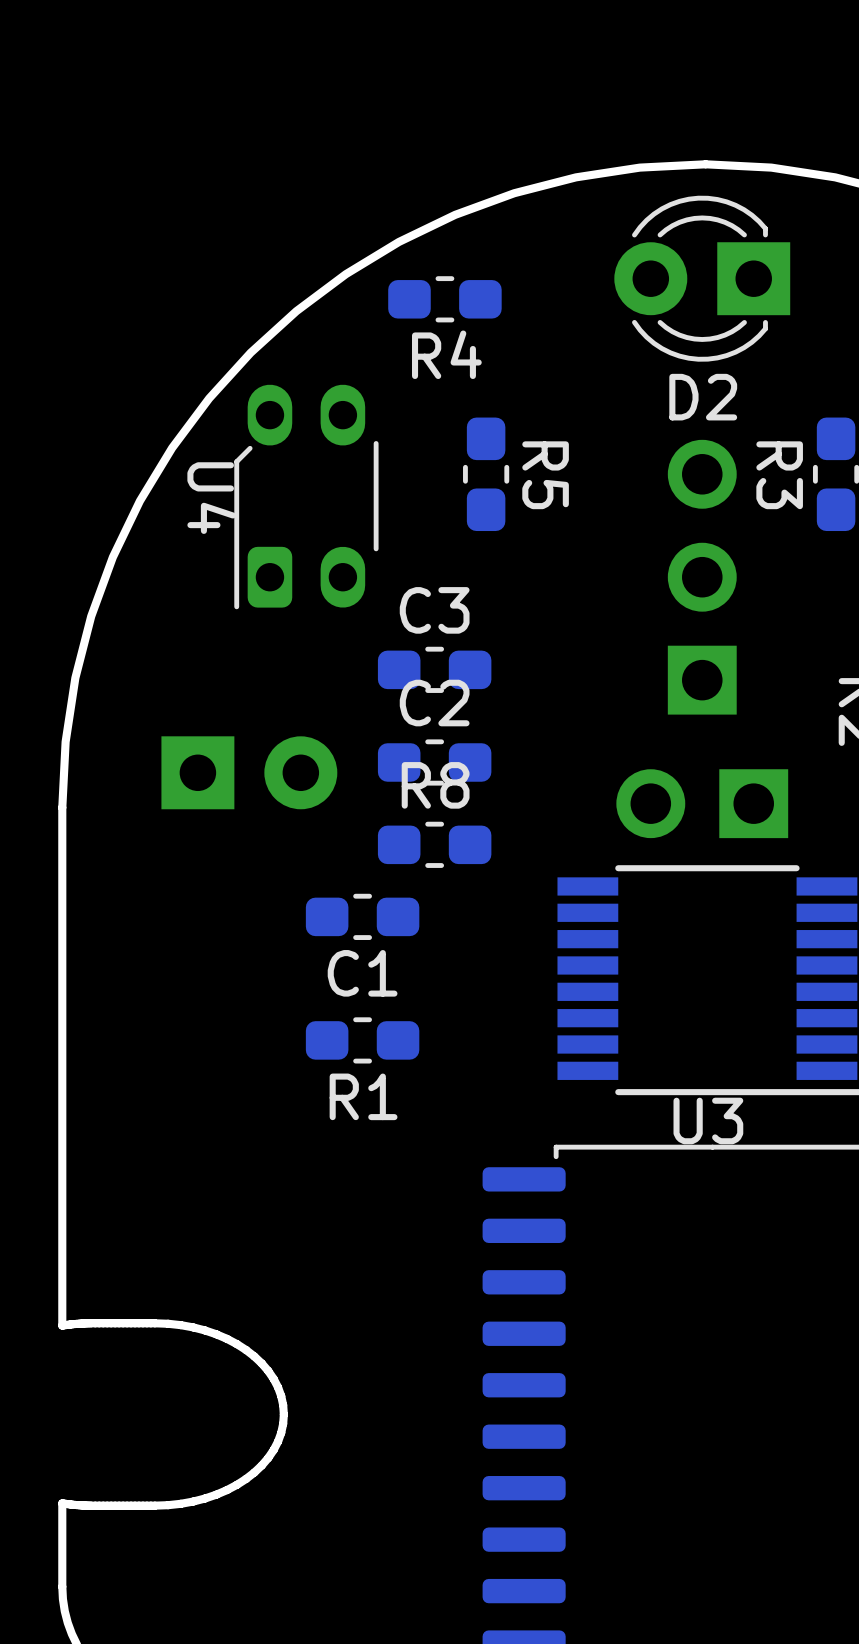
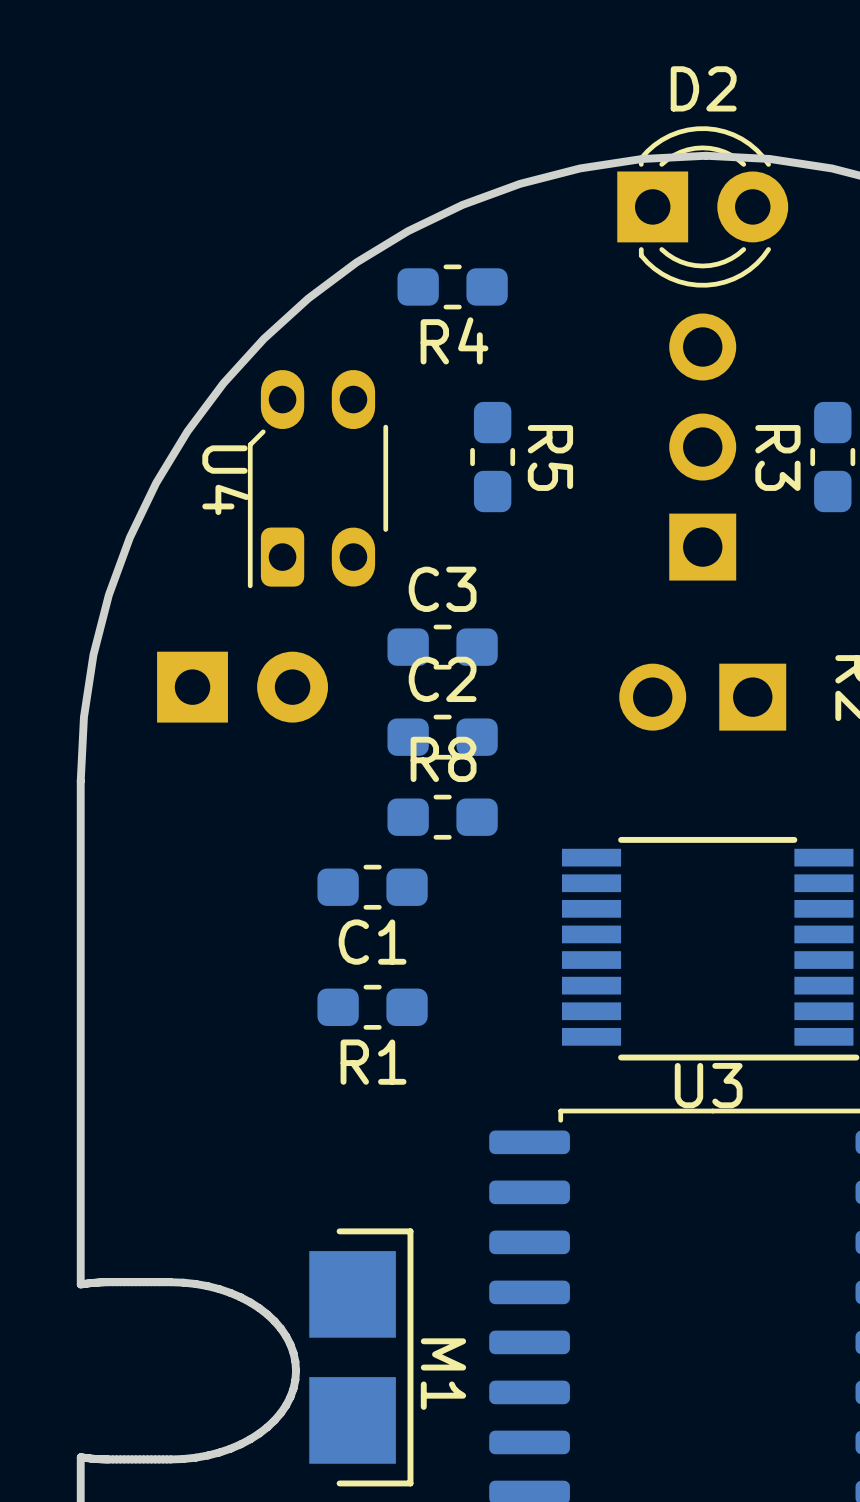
D2 rotation: 0° (702, 278) -> 180° (702, 206)
part position: (702, 577) -> (702, 447)
part position: (249, 772) -> (242, 687)
part position: (702, 803) -> (702, 697)
M1: none -> (361, 1357)

